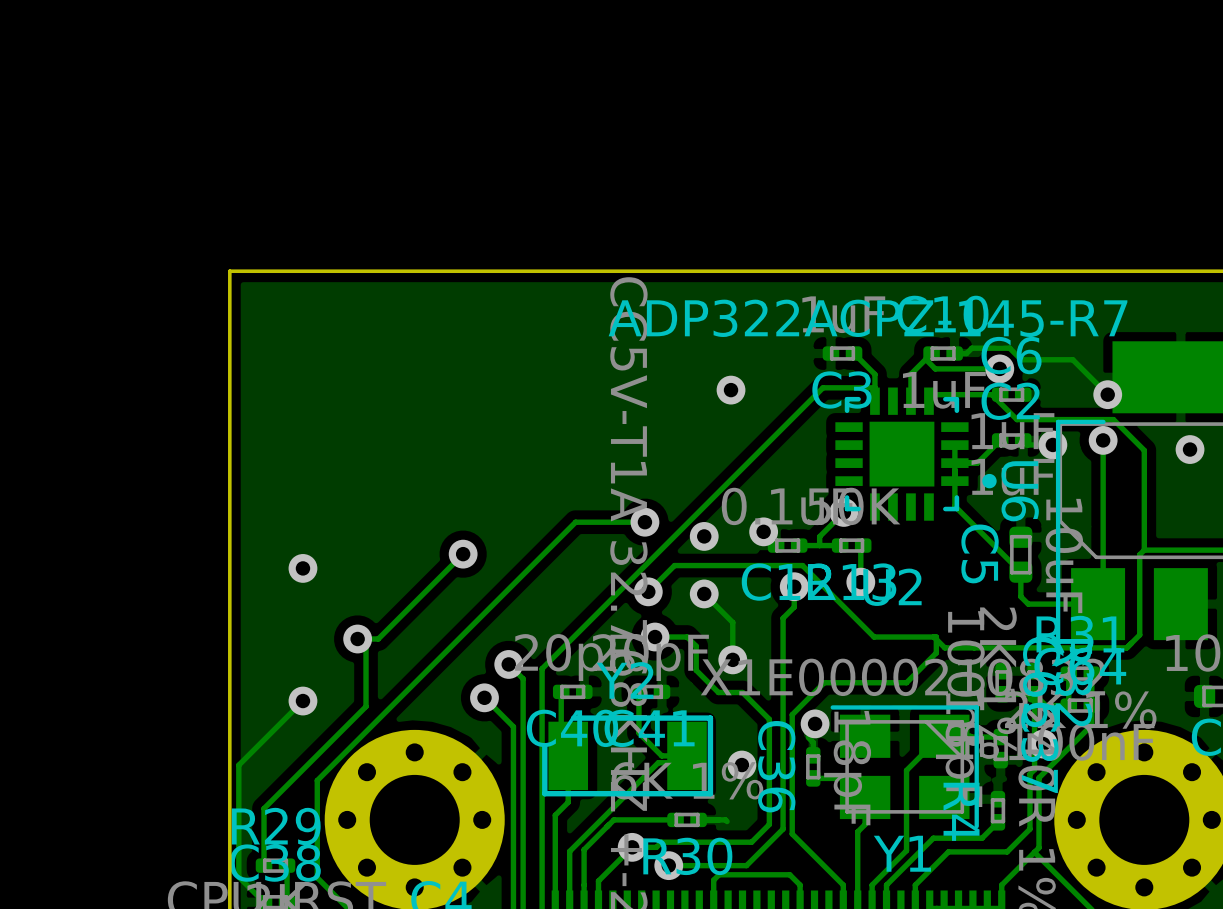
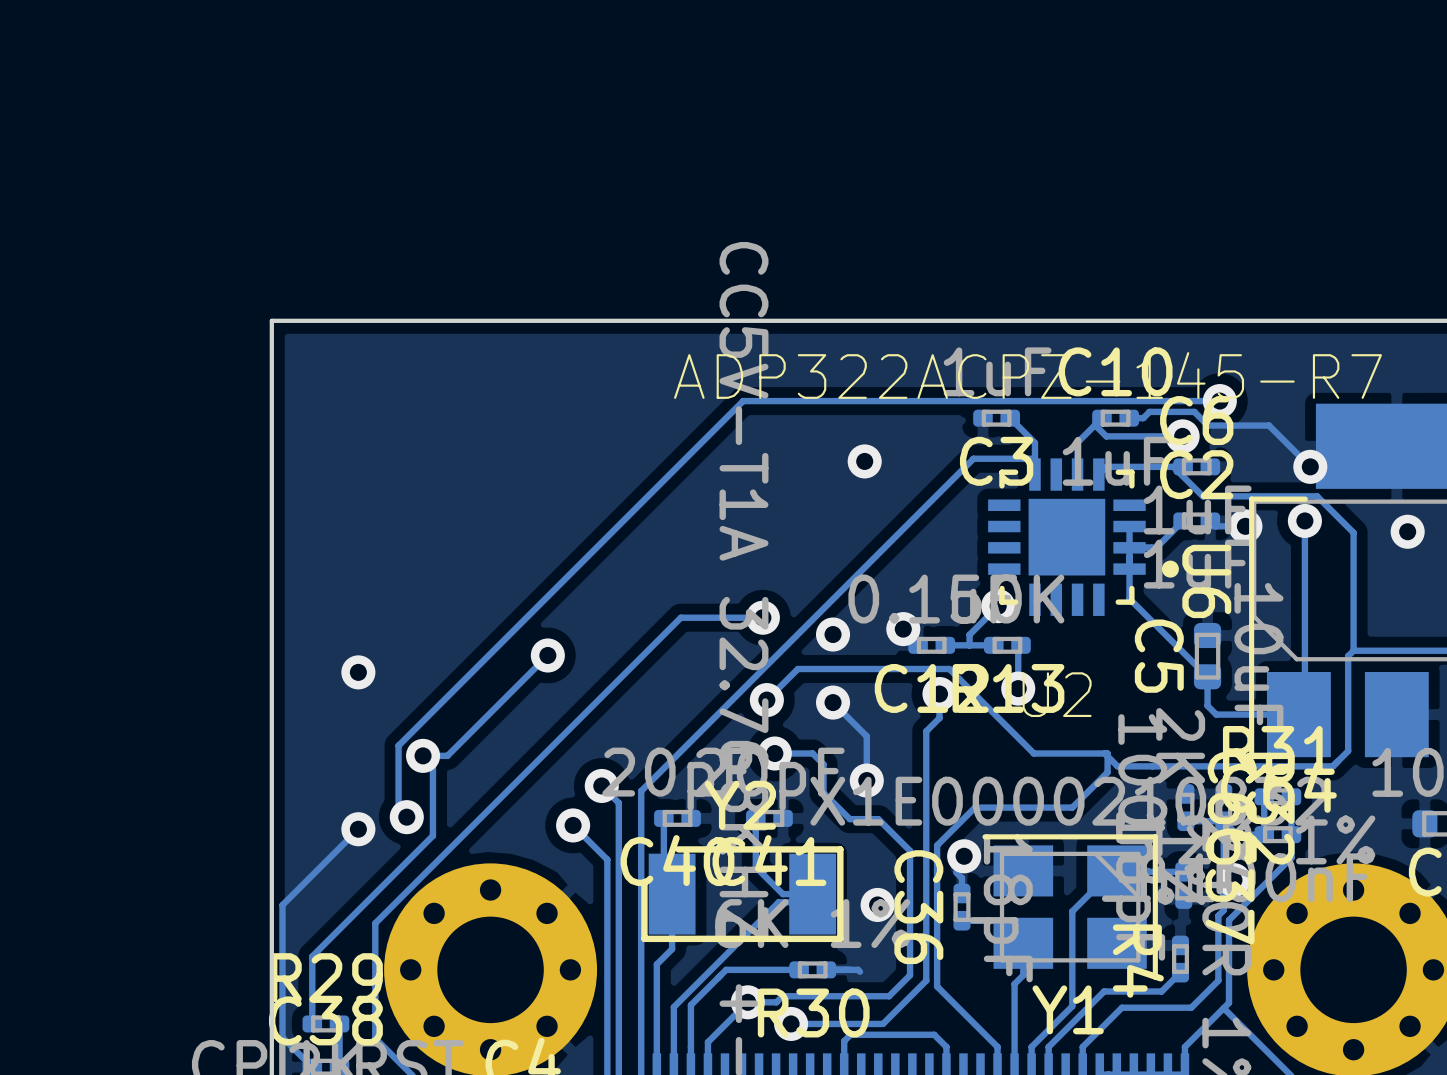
track: none -> (1219, 401) (743, 401) (398, 745) (398, 808) (406, 817)
via: none -> (1219, 401)
via: none -> (406, 817)

